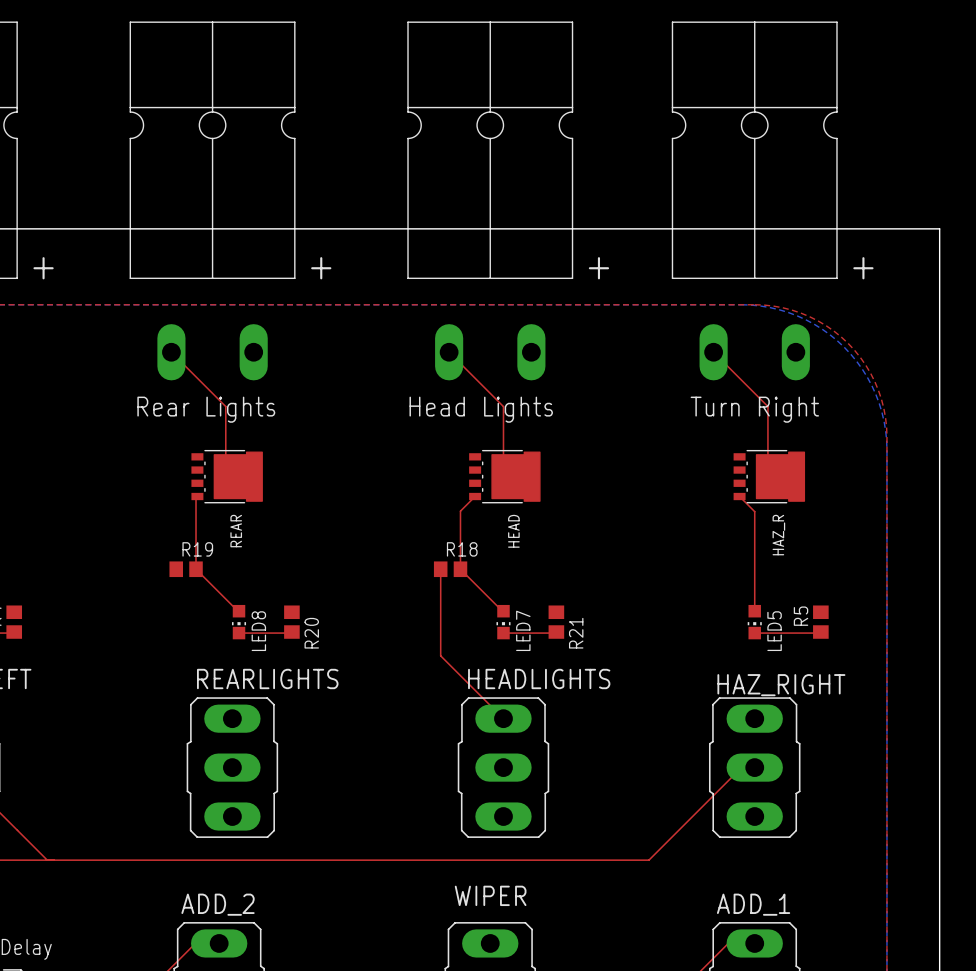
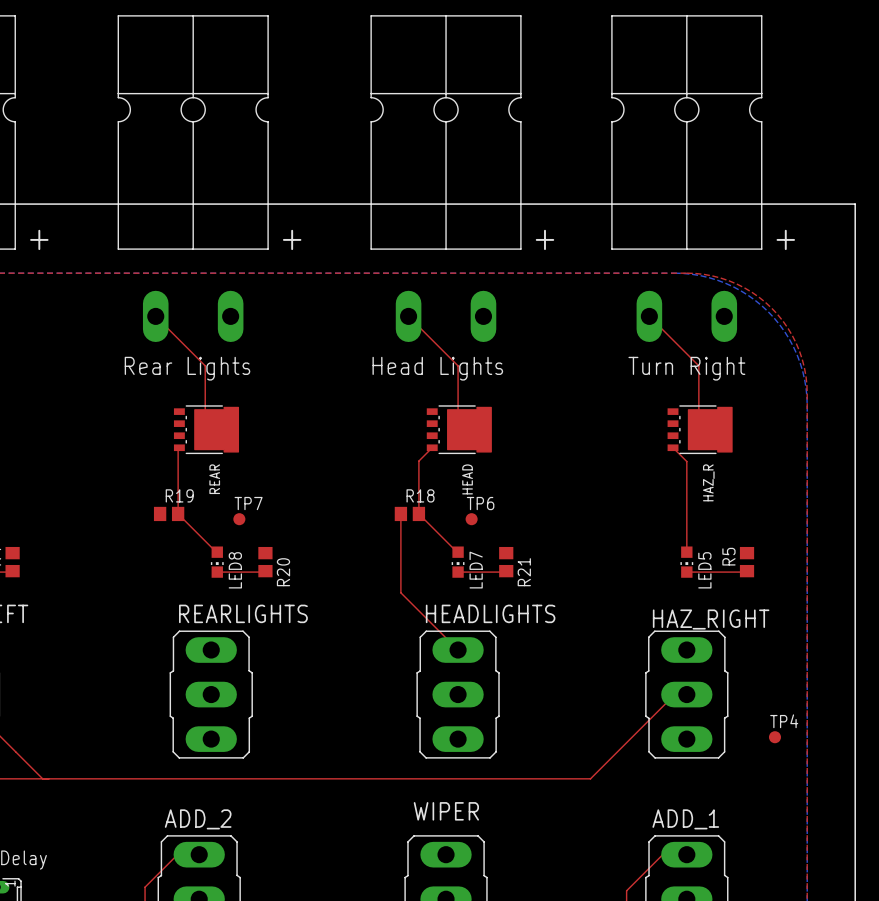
TP7: none -> (239, 519)
TP6: none -> (471, 519)
TP4: none -> (774, 737)

